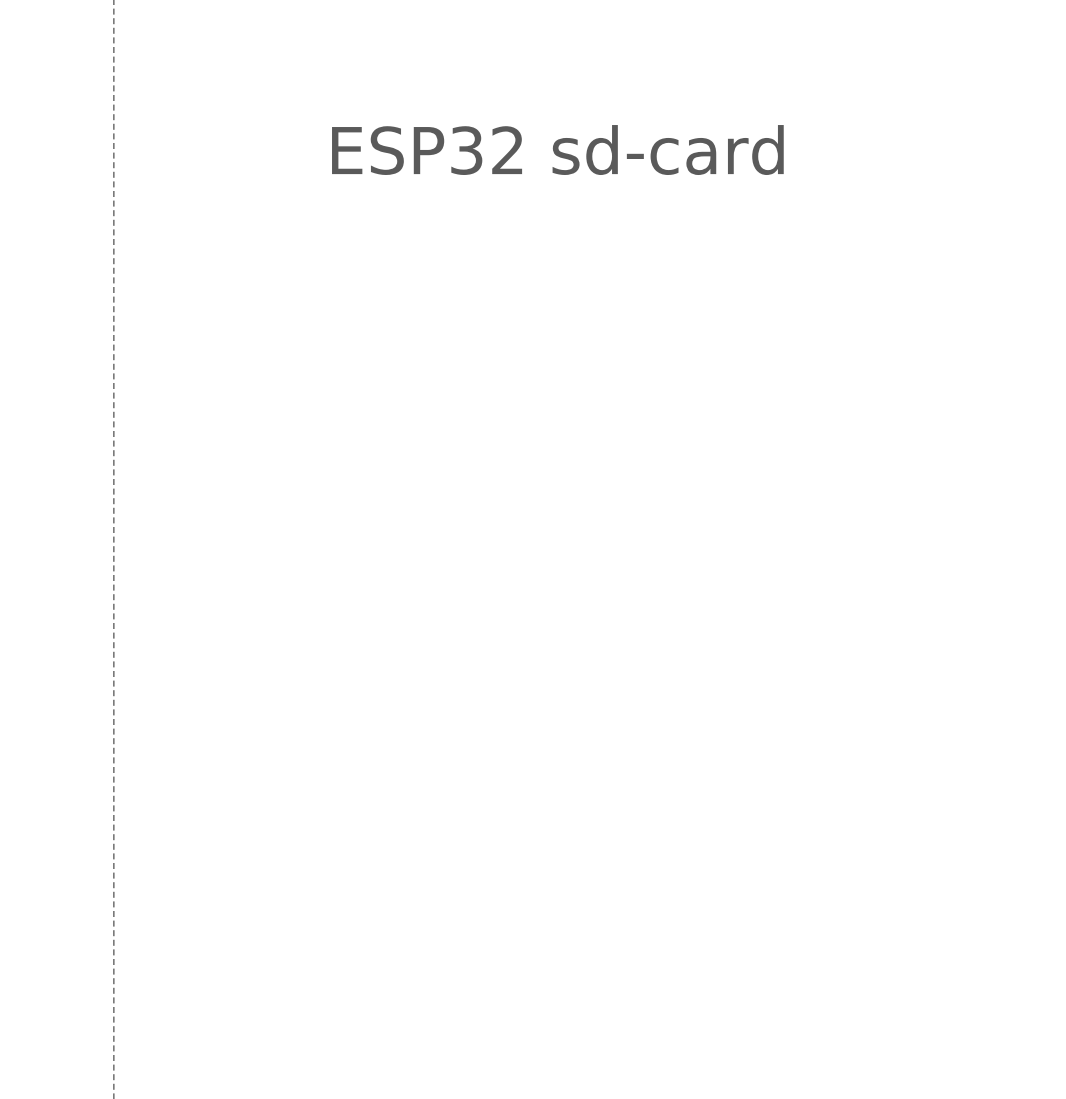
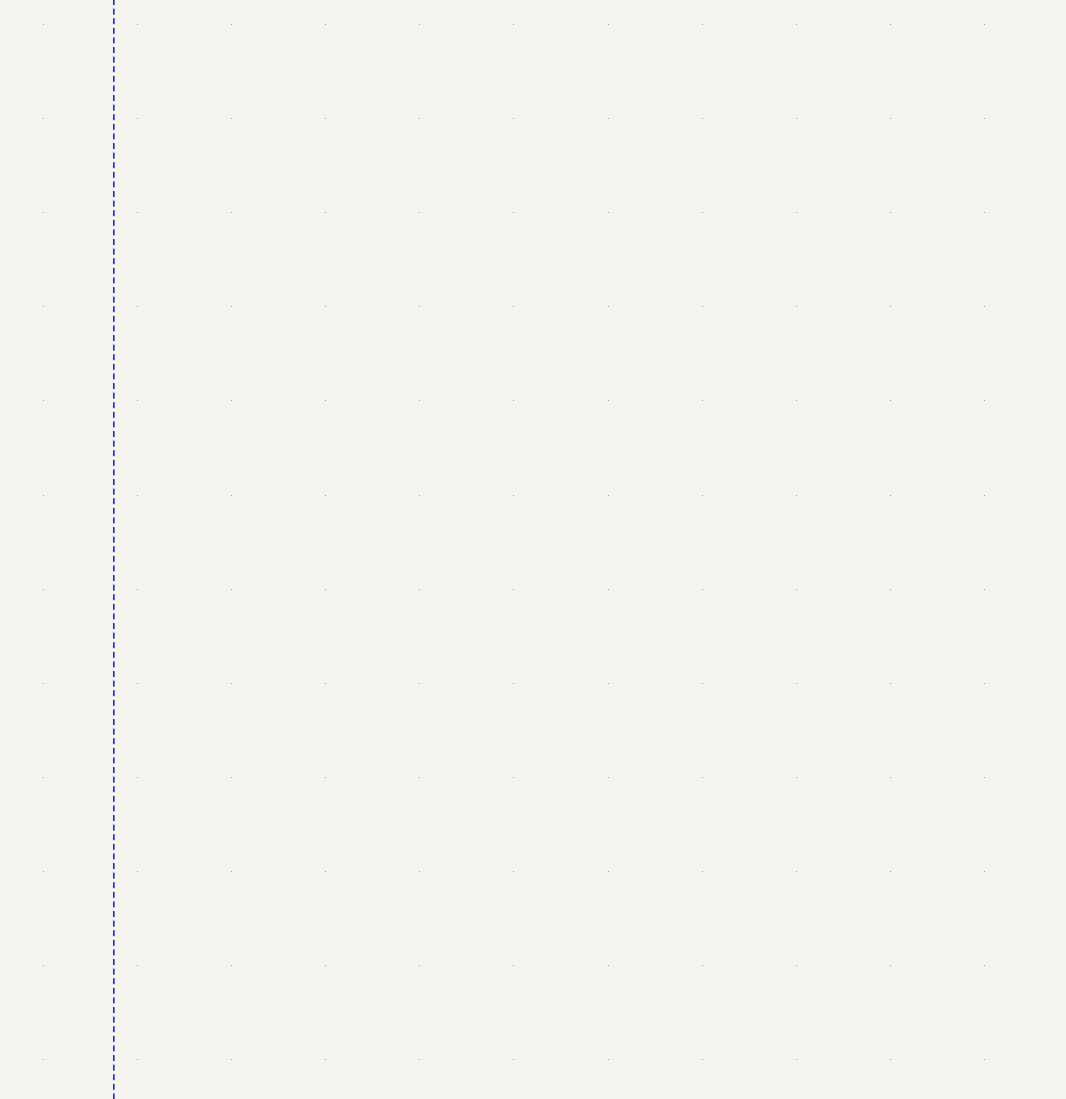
text: ESP32 sd-card (557, 150) -> none

